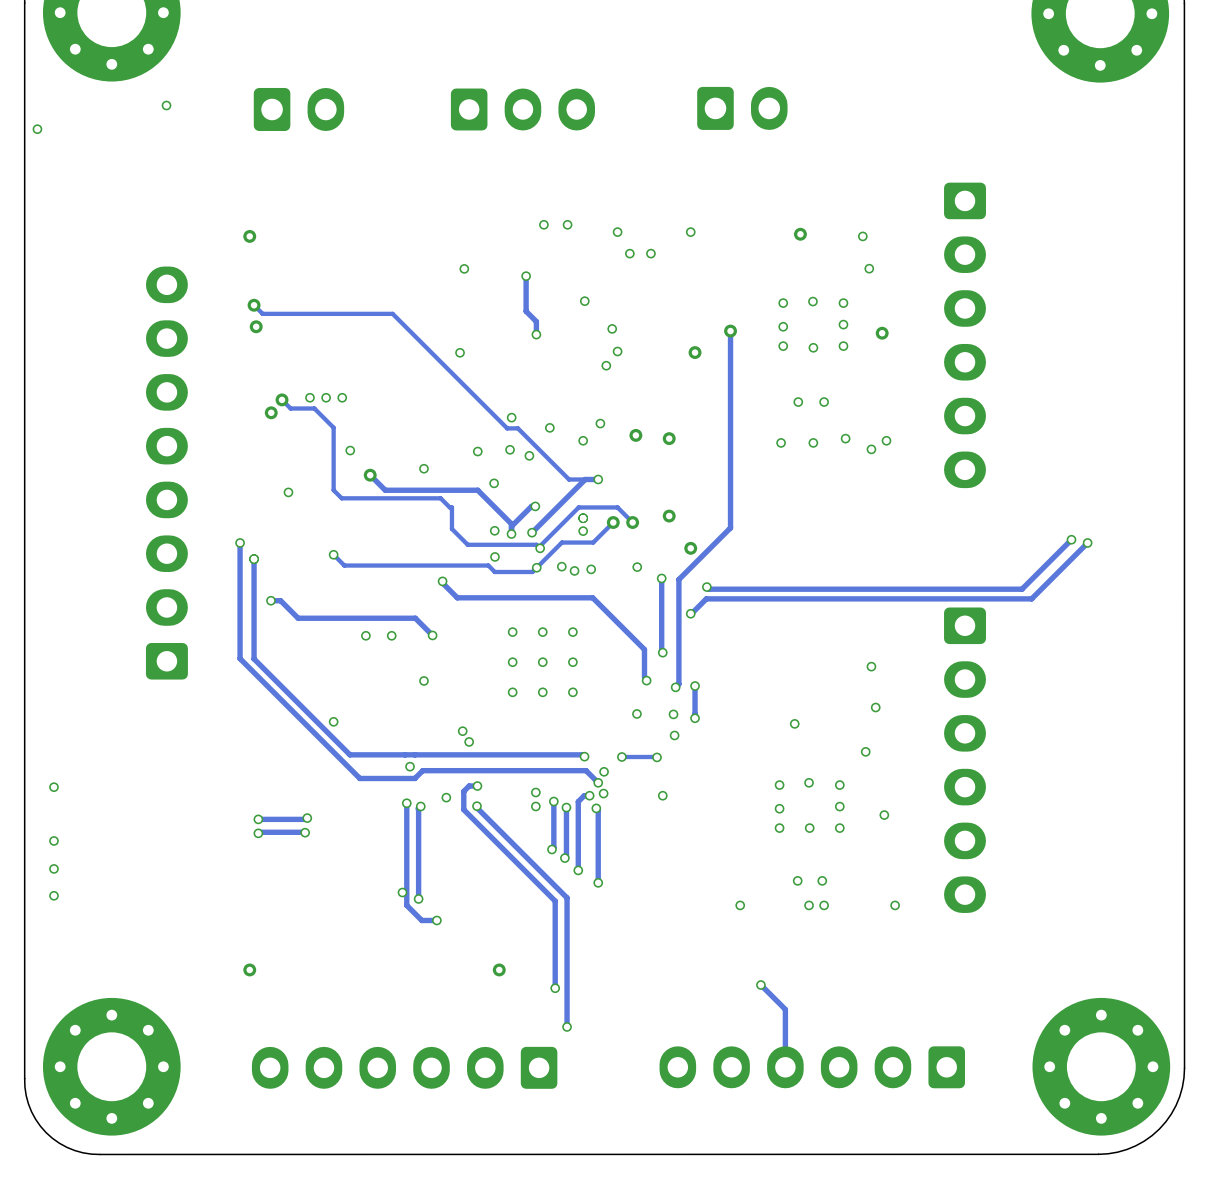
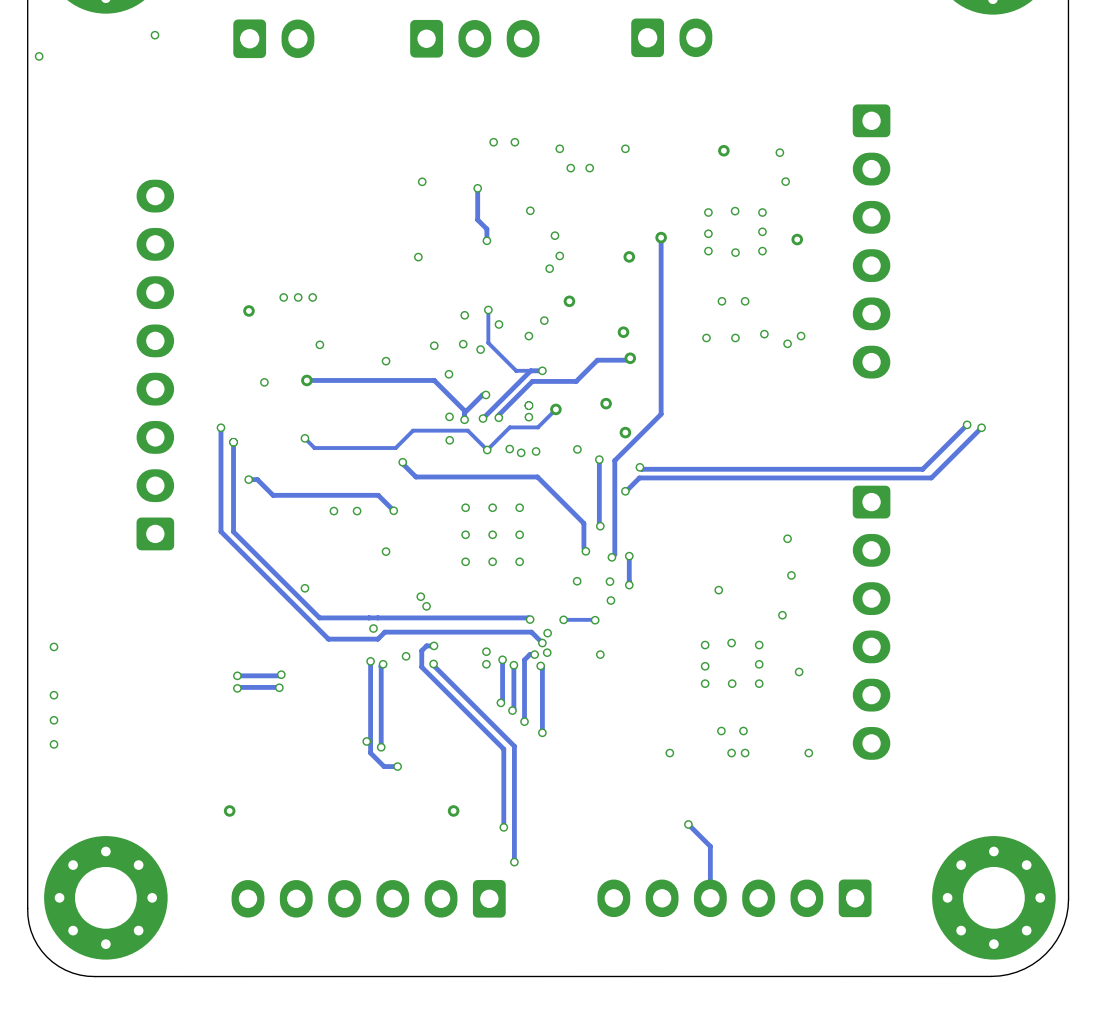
via: (249, 236) -> none
track: (254, 305) (262, 313) (392, 313) (507, 428) (517, 428) (538, 448) -> (488, 309) (488, 342)
via: (254, 305) -> none
via: (256, 326) -> none
track: (282, 399) (290, 408) (314, 408) (333, 427) (333, 490) (341, 498) (440, 498) (451, 507) (451, 528) (467, 544) (536, 544) (540, 548) (540, 546) (578, 507) (617, 507) (632, 522) -> none
via: (282, 399) -> none
via: none -> (569, 301)
via: none -> (488, 309)
via: (635, 435) -> none
via: none -> (623, 332)
via: (669, 438) -> none
track: none -> (630, 358) (628, 360) (597, 360) (576, 381) (532, 381) (498, 415) (498, 417)
via: none -> (630, 358)
track: (370, 475) (385, 490) -> (306, 380) (351, 380)
via position: (370, 475) -> (306, 380)
via: (632, 522) -> none
via position: (540, 548) -> (498, 417)
track: (434, 565) (488, 565) (494, 571) (532, 571) (536, 567) -> (395, 448) (413, 430) (467, 430) (487, 450)

